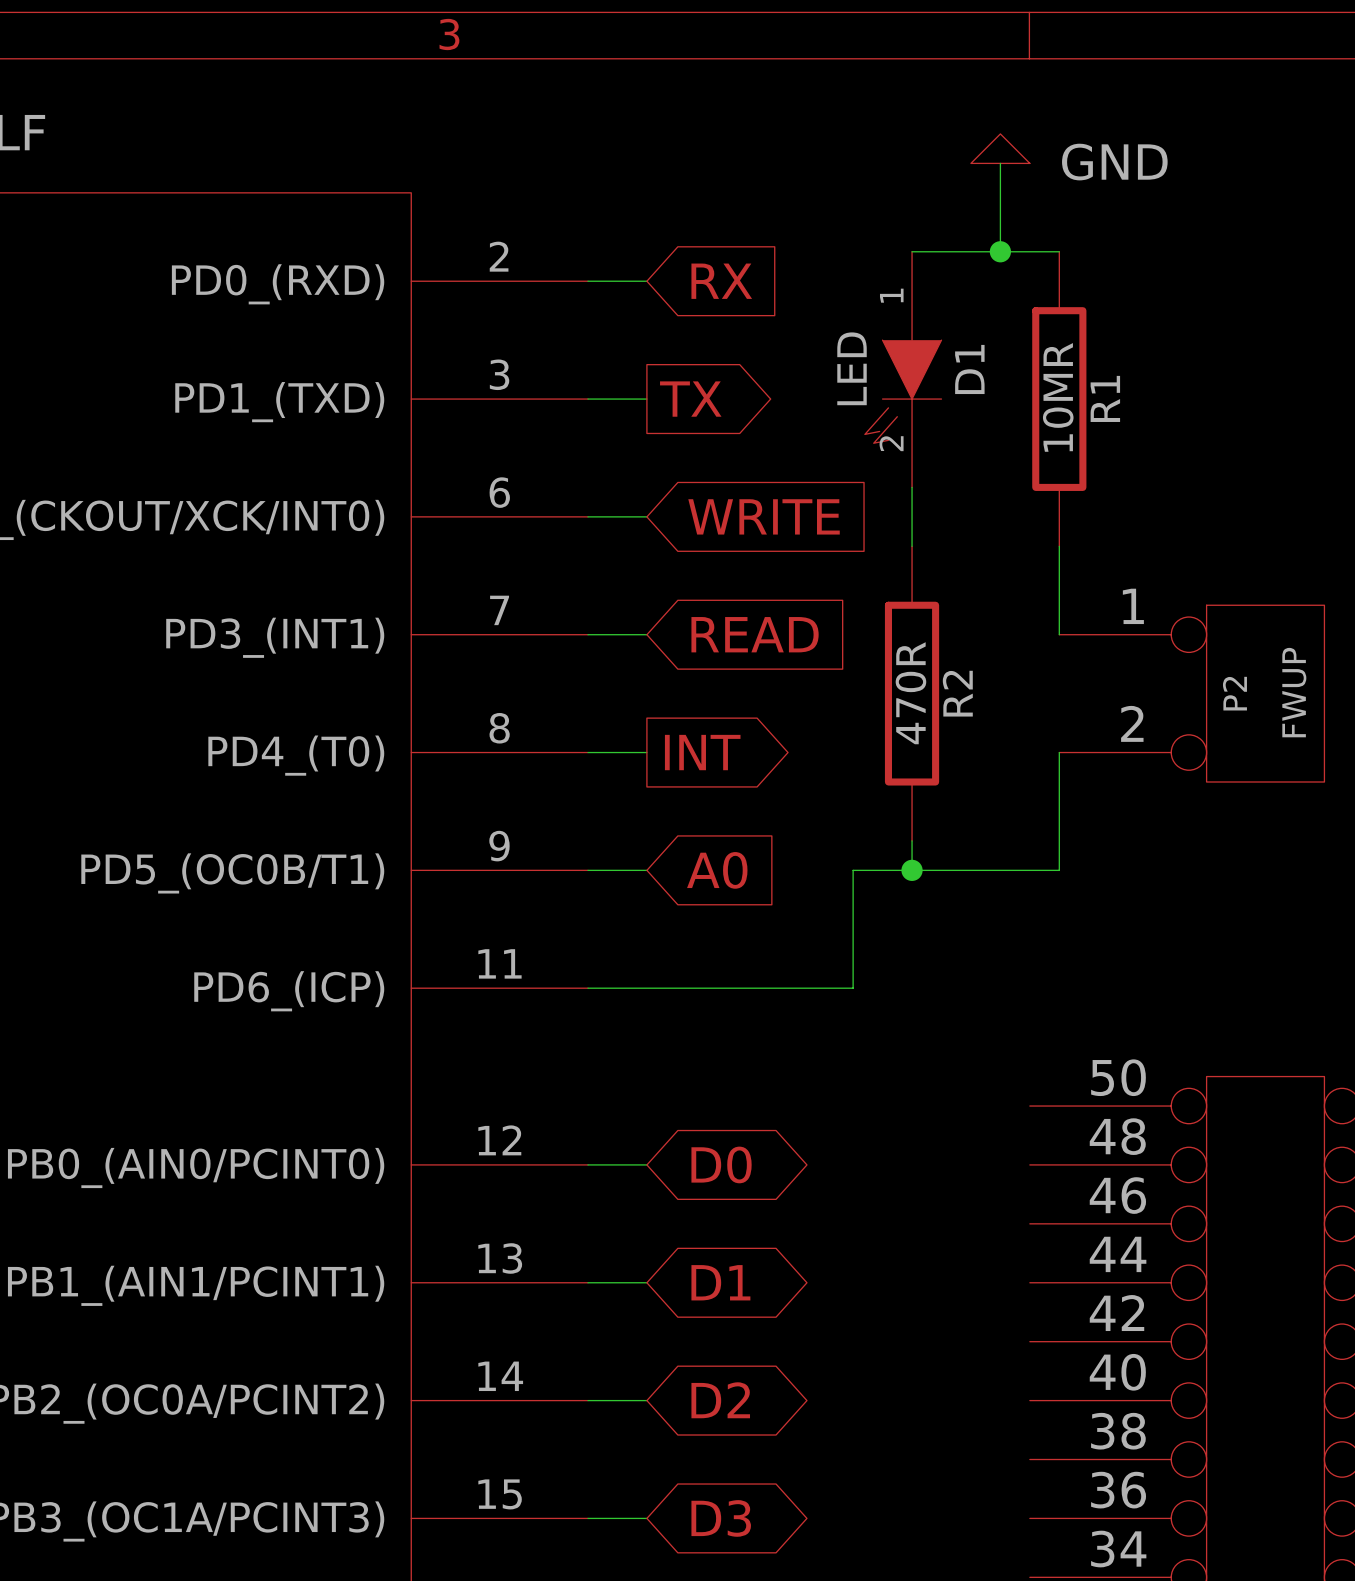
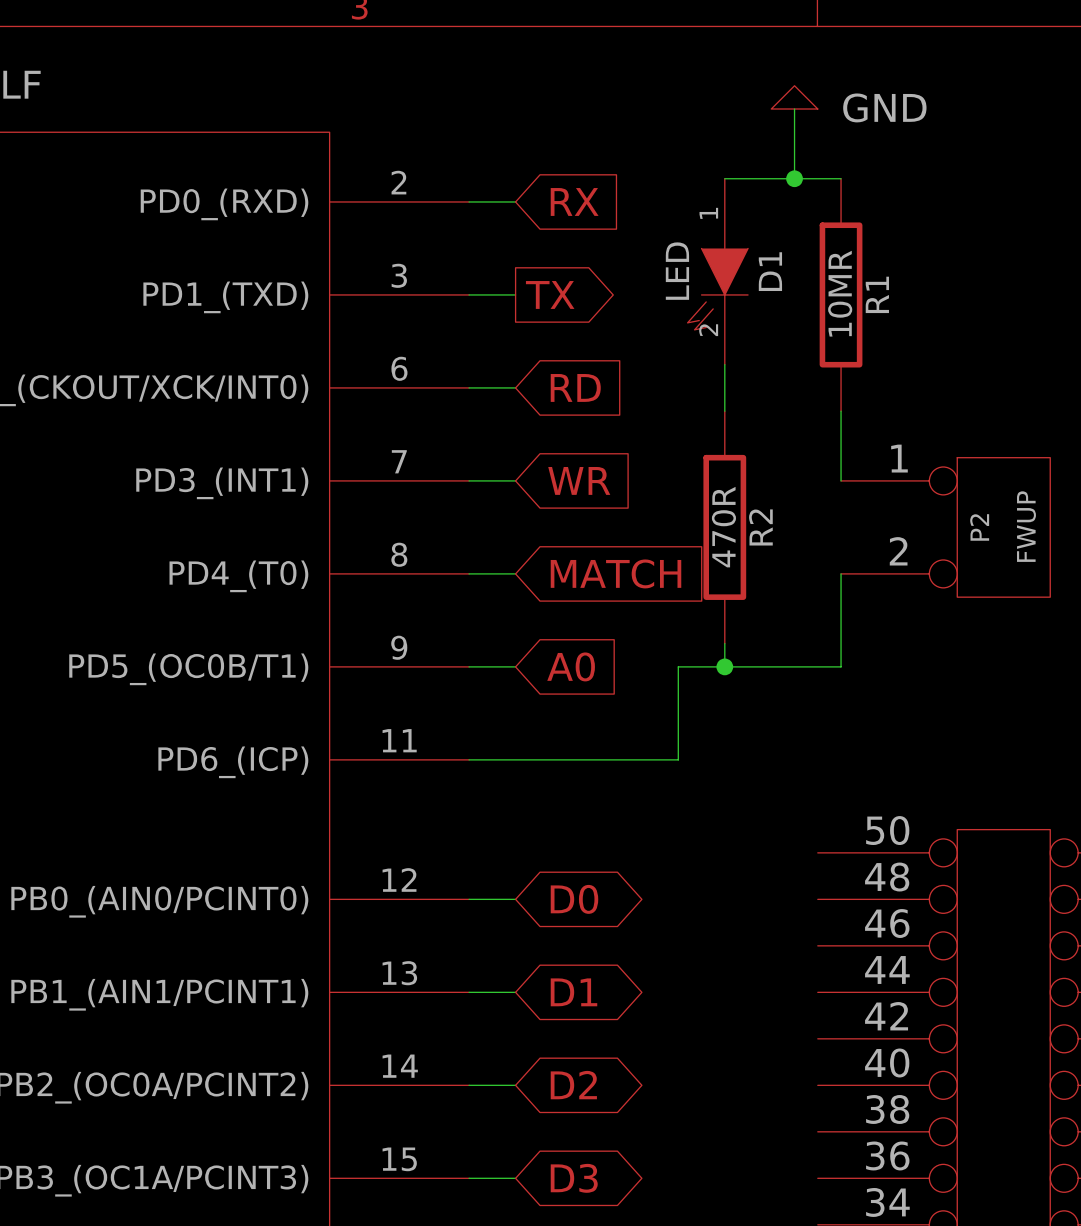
global label: WRITE (764, 516) -> RD (575, 387)
global label: READ (755, 634) -> WR (579, 480)
global label shape: output (702, 752) -> input (615, 573)
global label: INT (702, 752) -> MATCH (615, 573)

